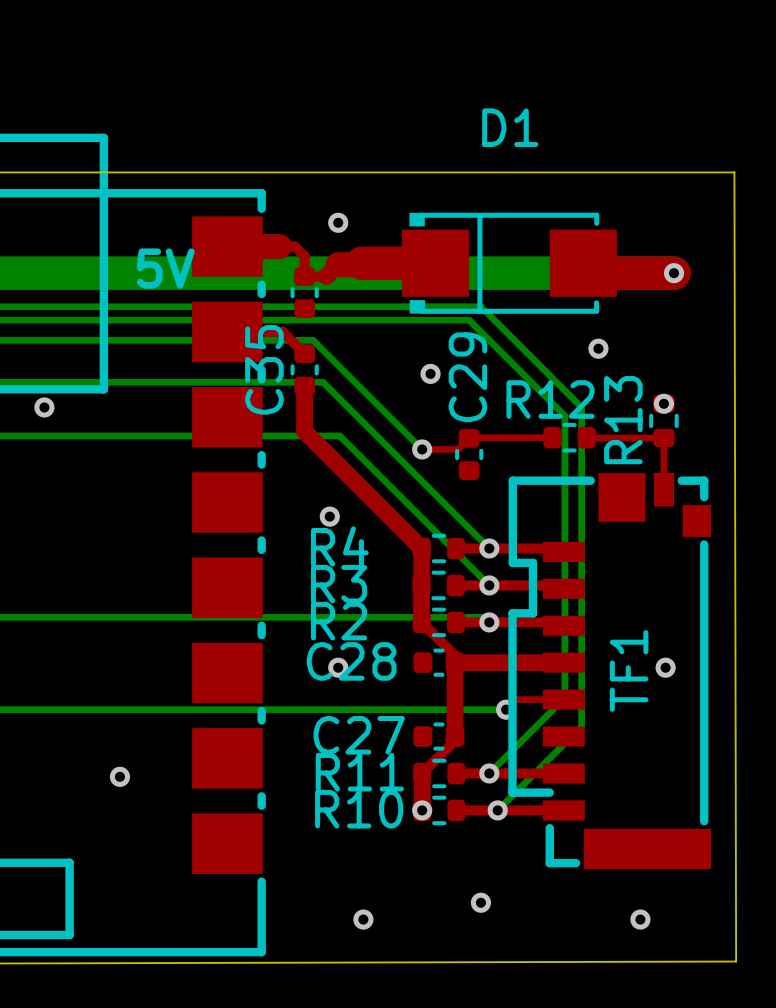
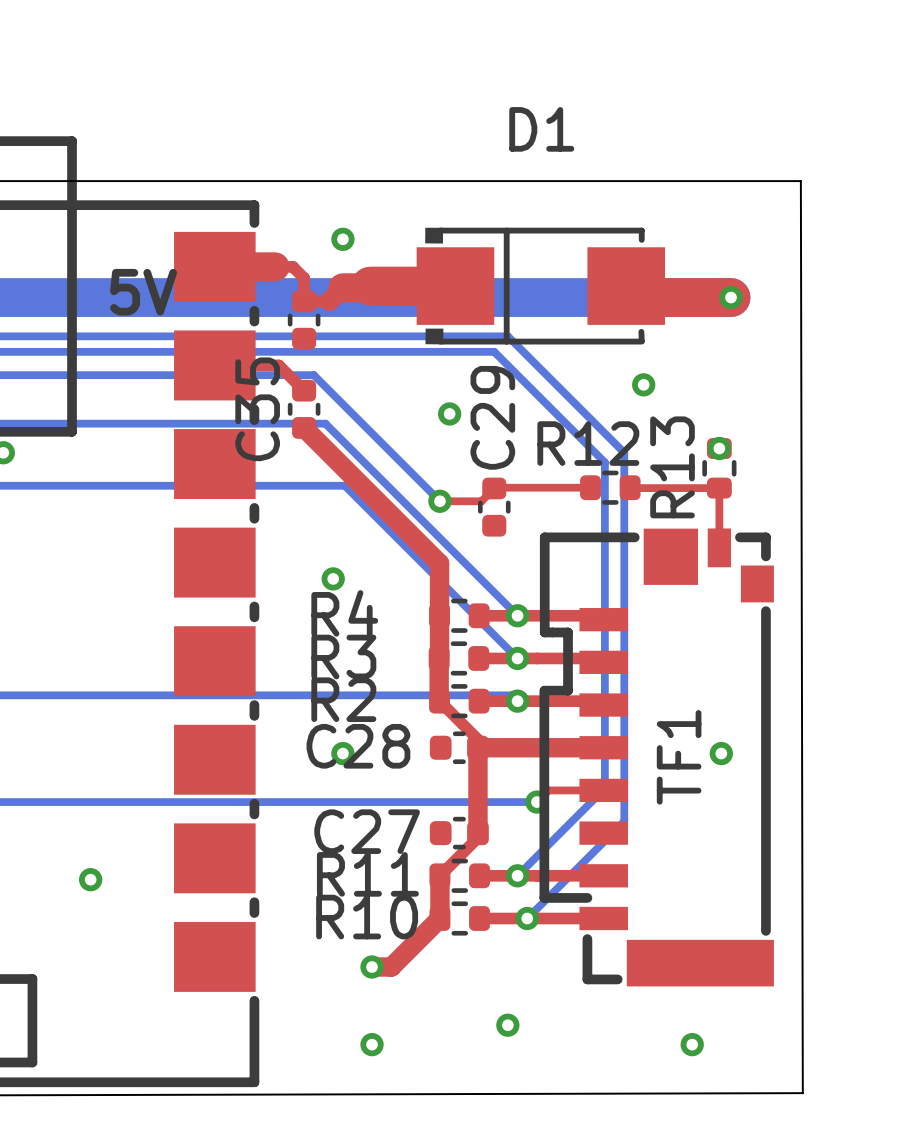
top track: (304, 385) (304, 431) (421, 548) -> (324, 448) (304, 427) (439, 563) (439, 615)
top track: none -> (439, 918) (391, 967) (372, 967)
via position: (422, 810) -> (372, 967)

